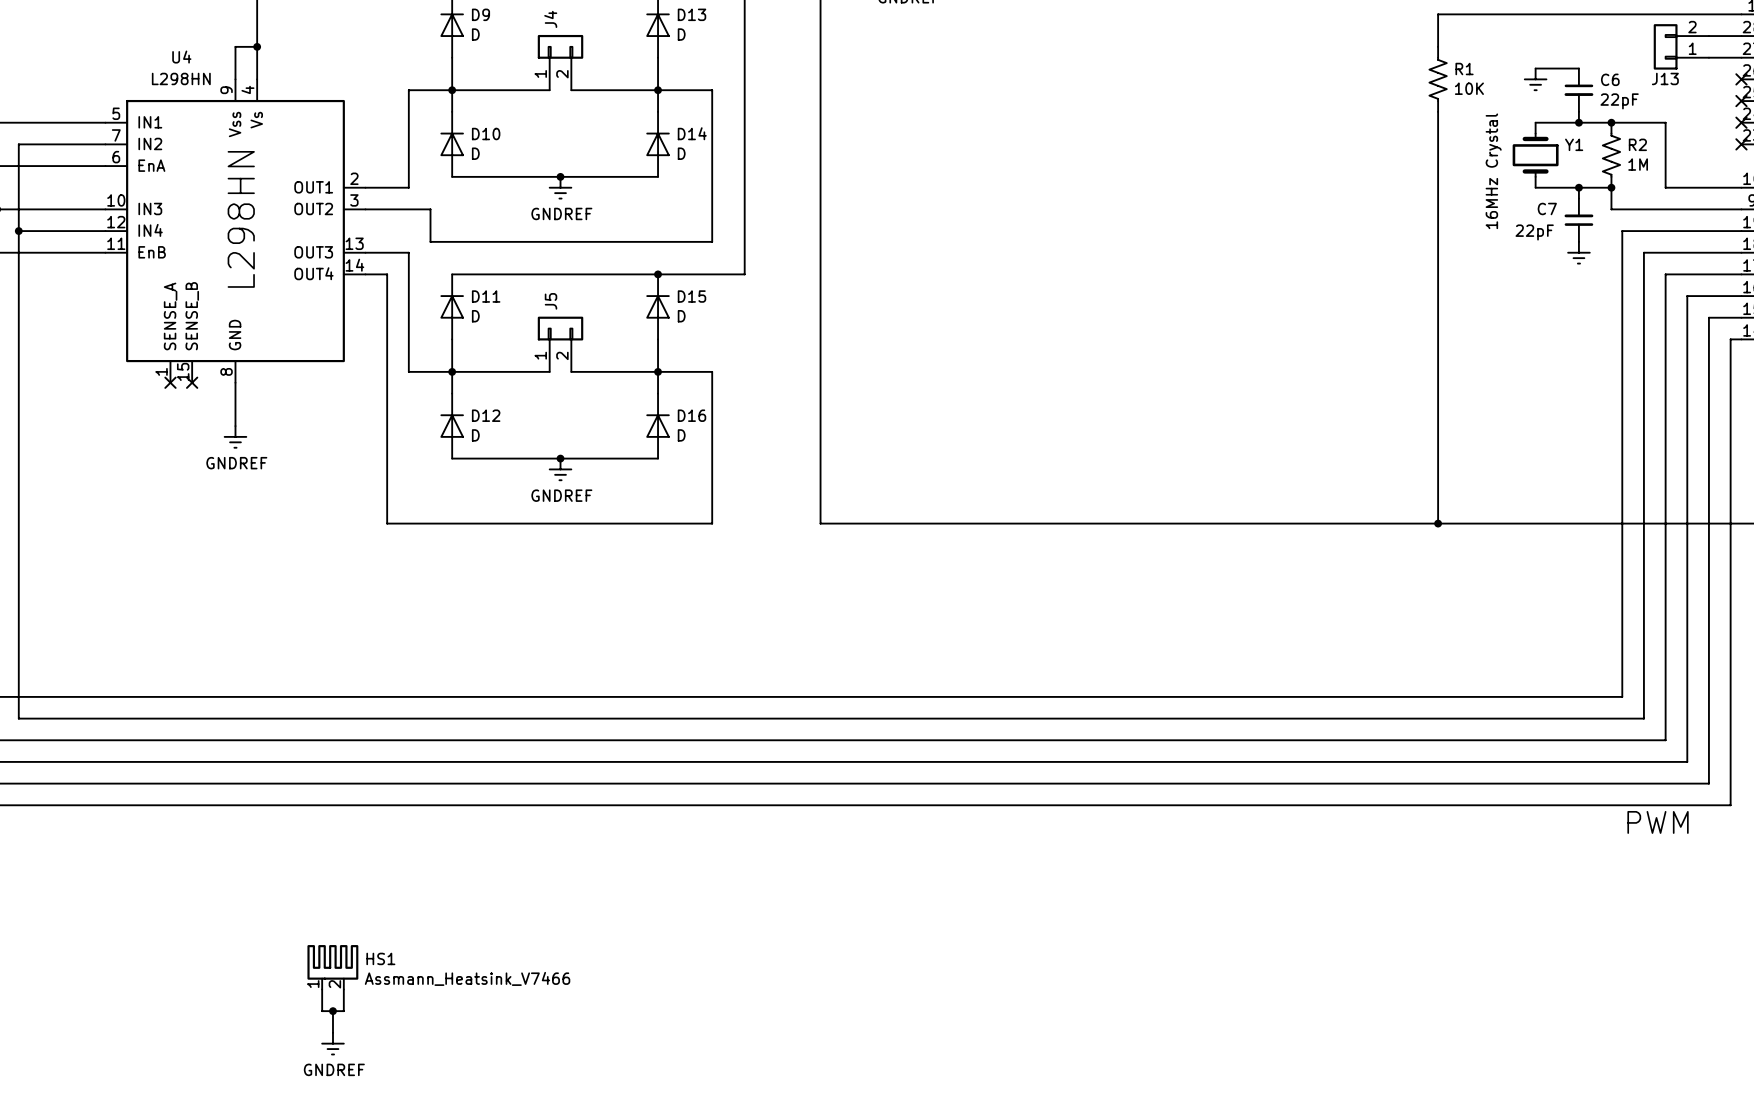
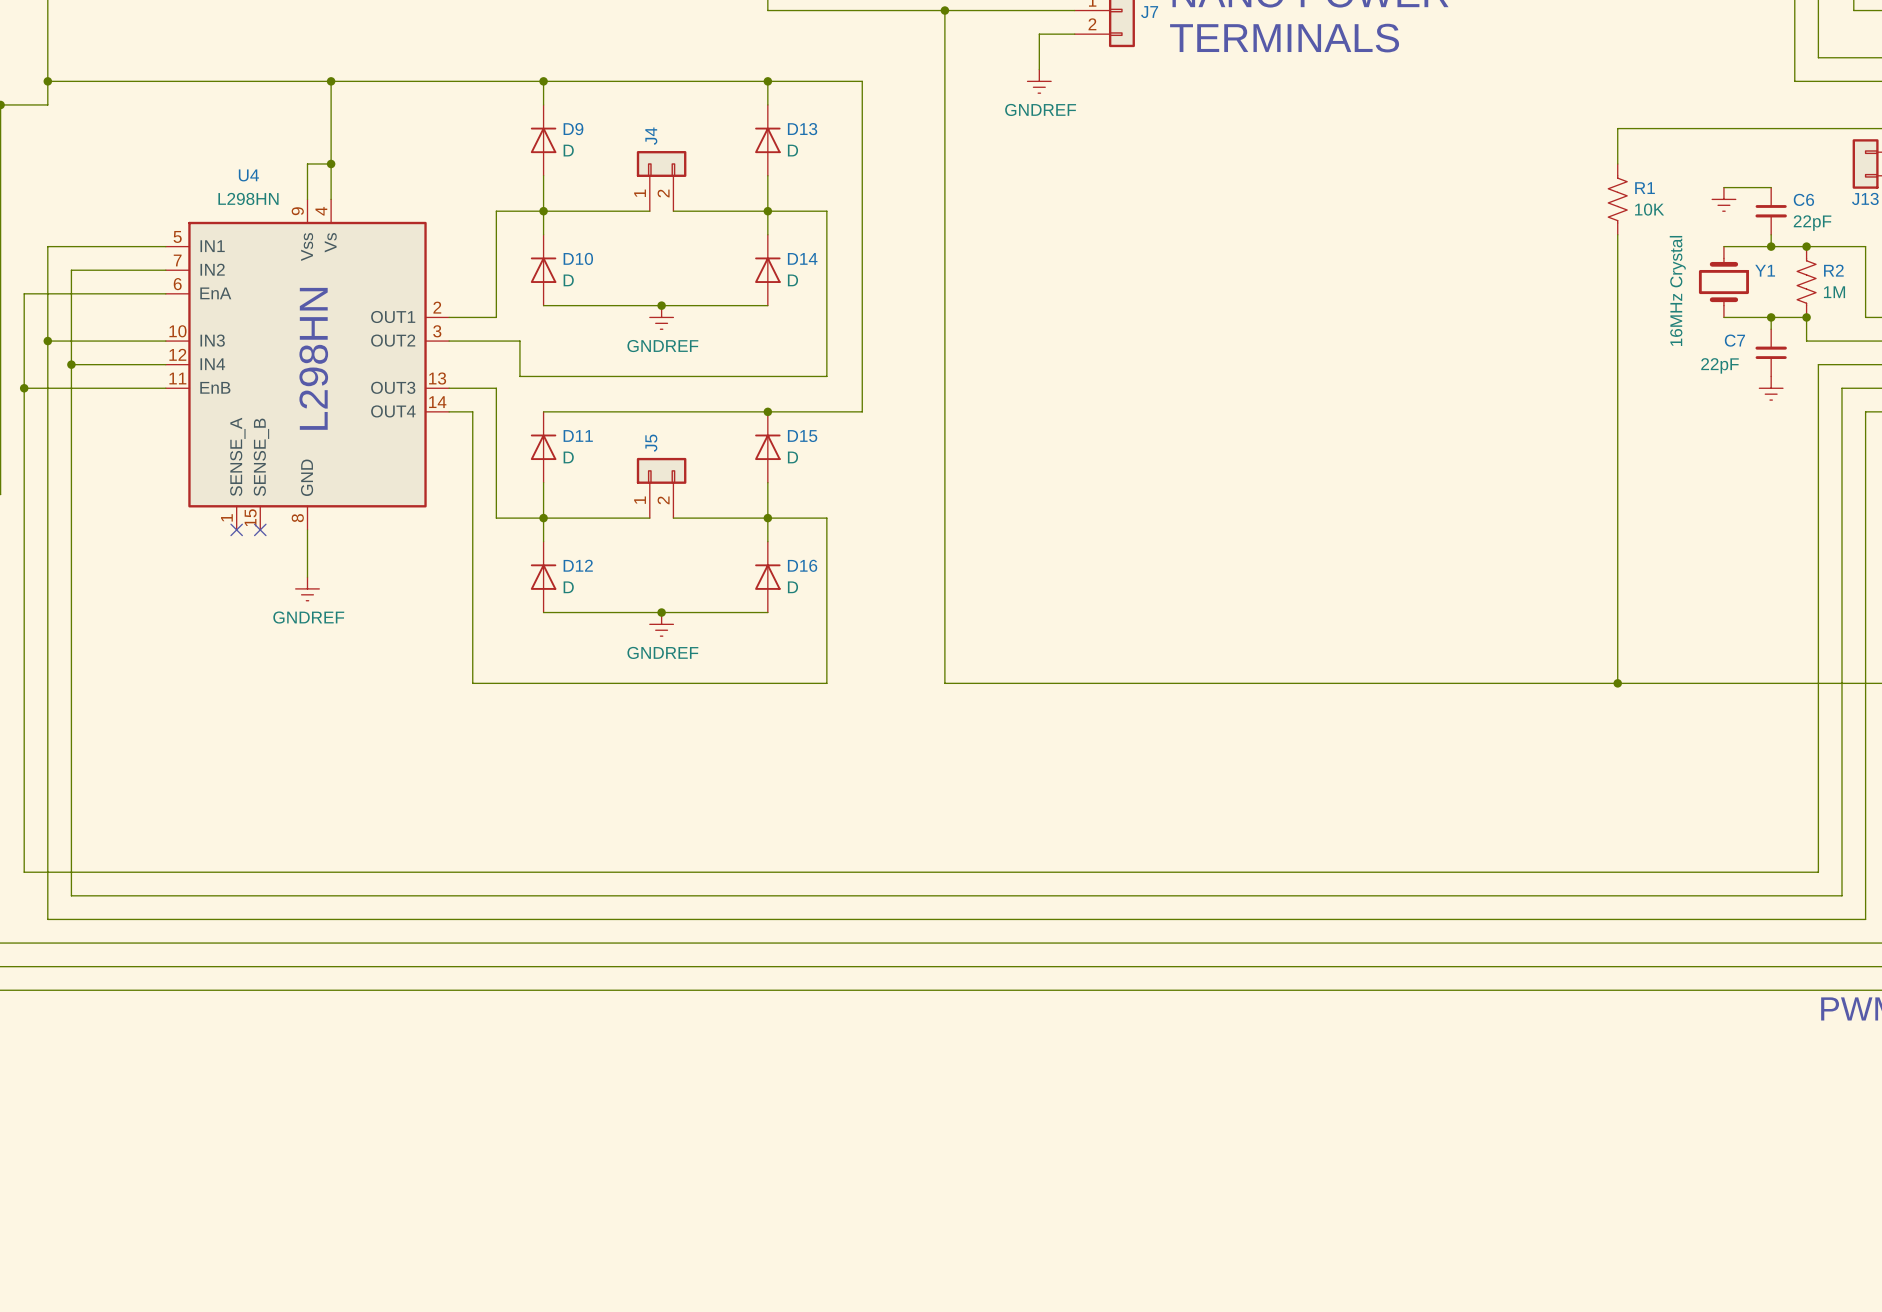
HS1: Assmann_Heatsink_V7466 (332, 967) -> none
wire: (322, 989) (322, 1011) (343, 1011) (343, 989) -> none
wire: (332, 1011) (332, 1032) -> none
junction: (332, 1011) -> none
power symbol: GNDREF (332, 1043) -> none

